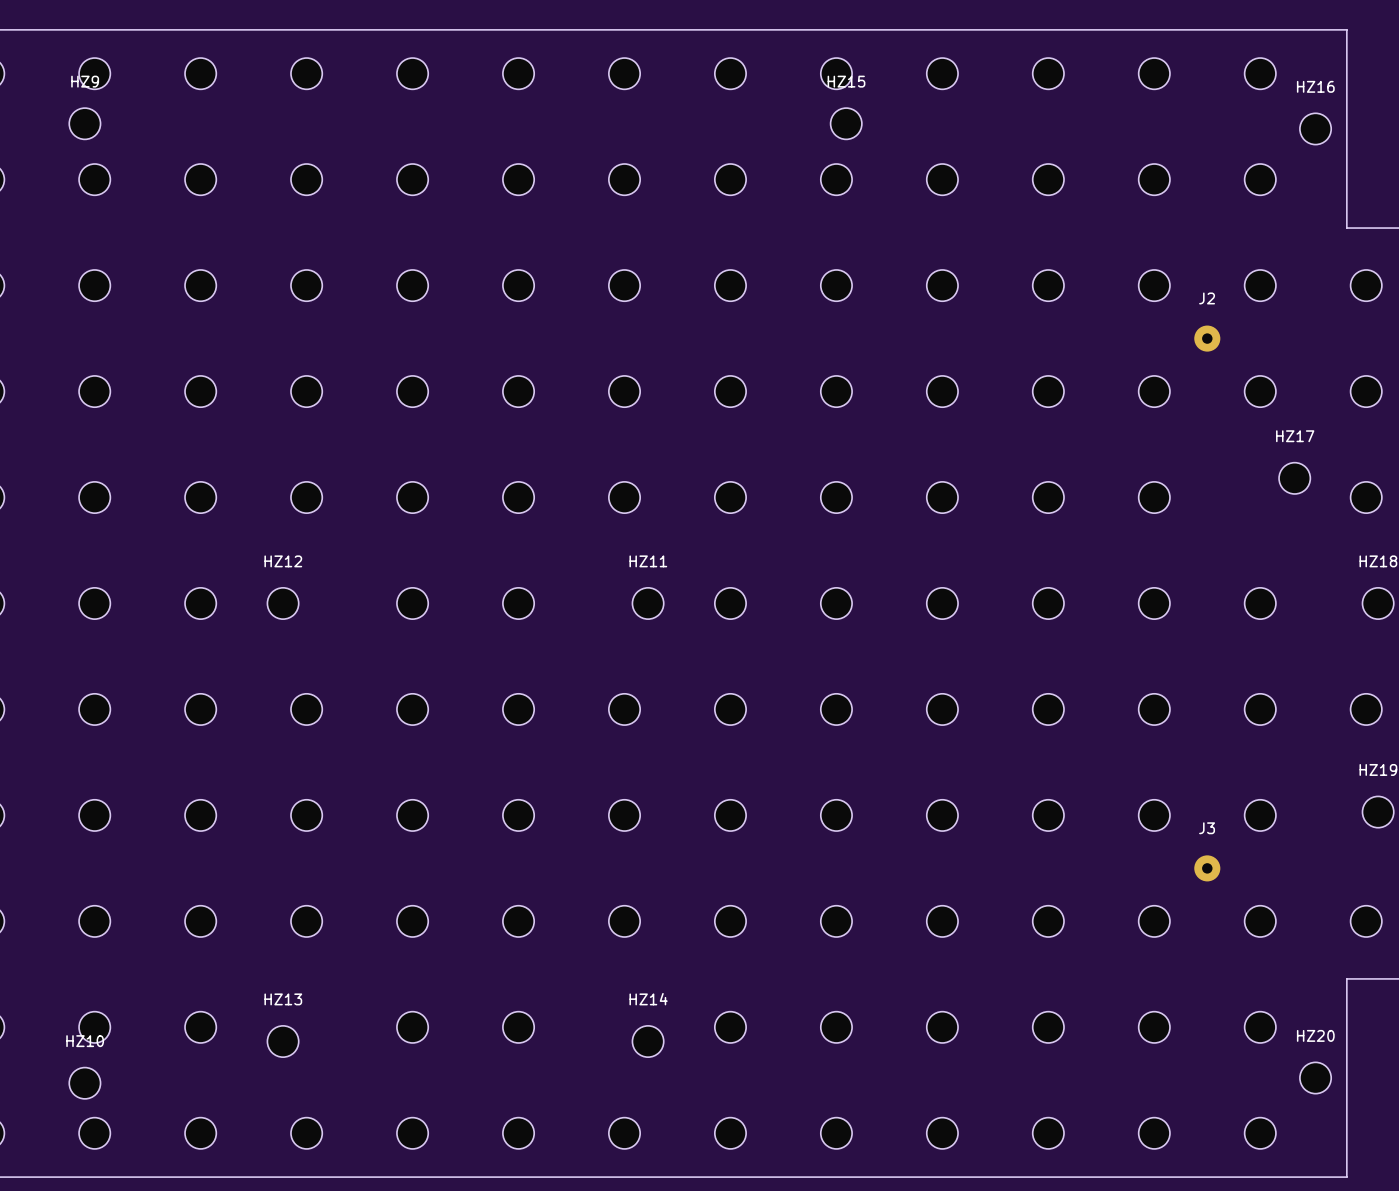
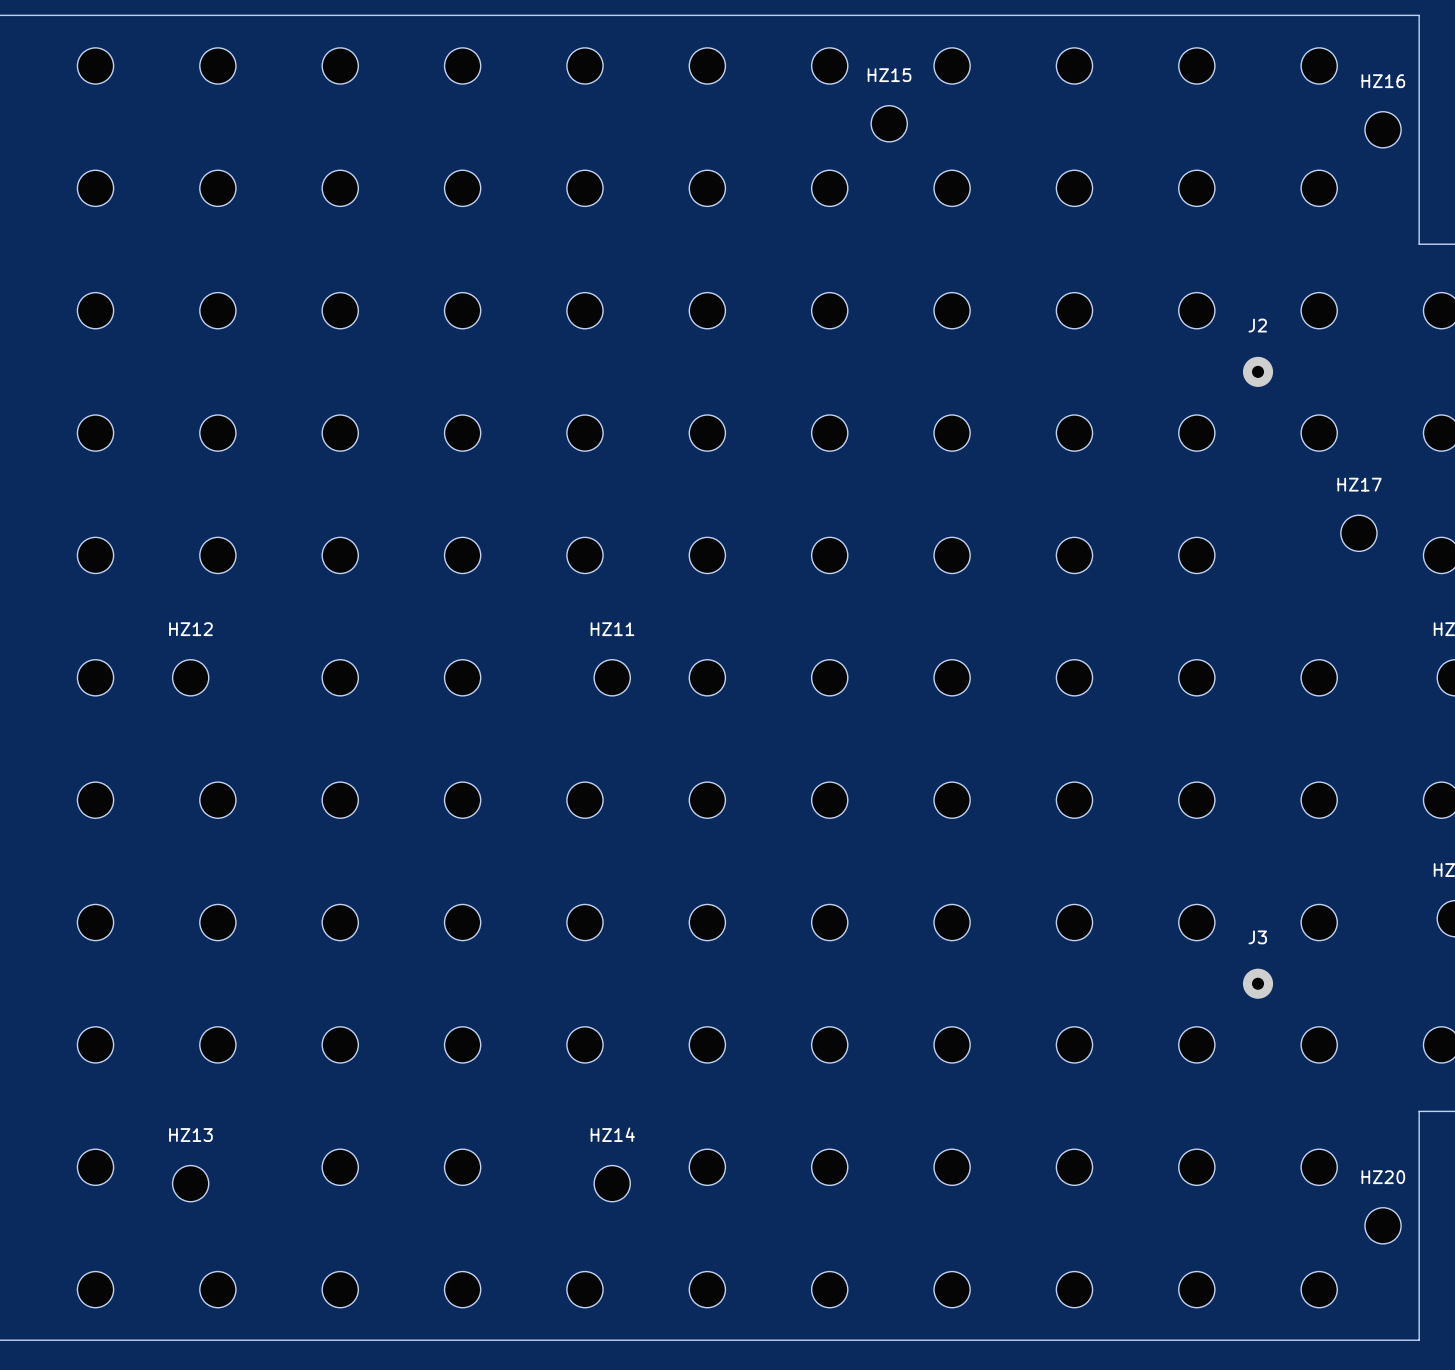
HZ15 position: (846, 123) -> (889, 123)

